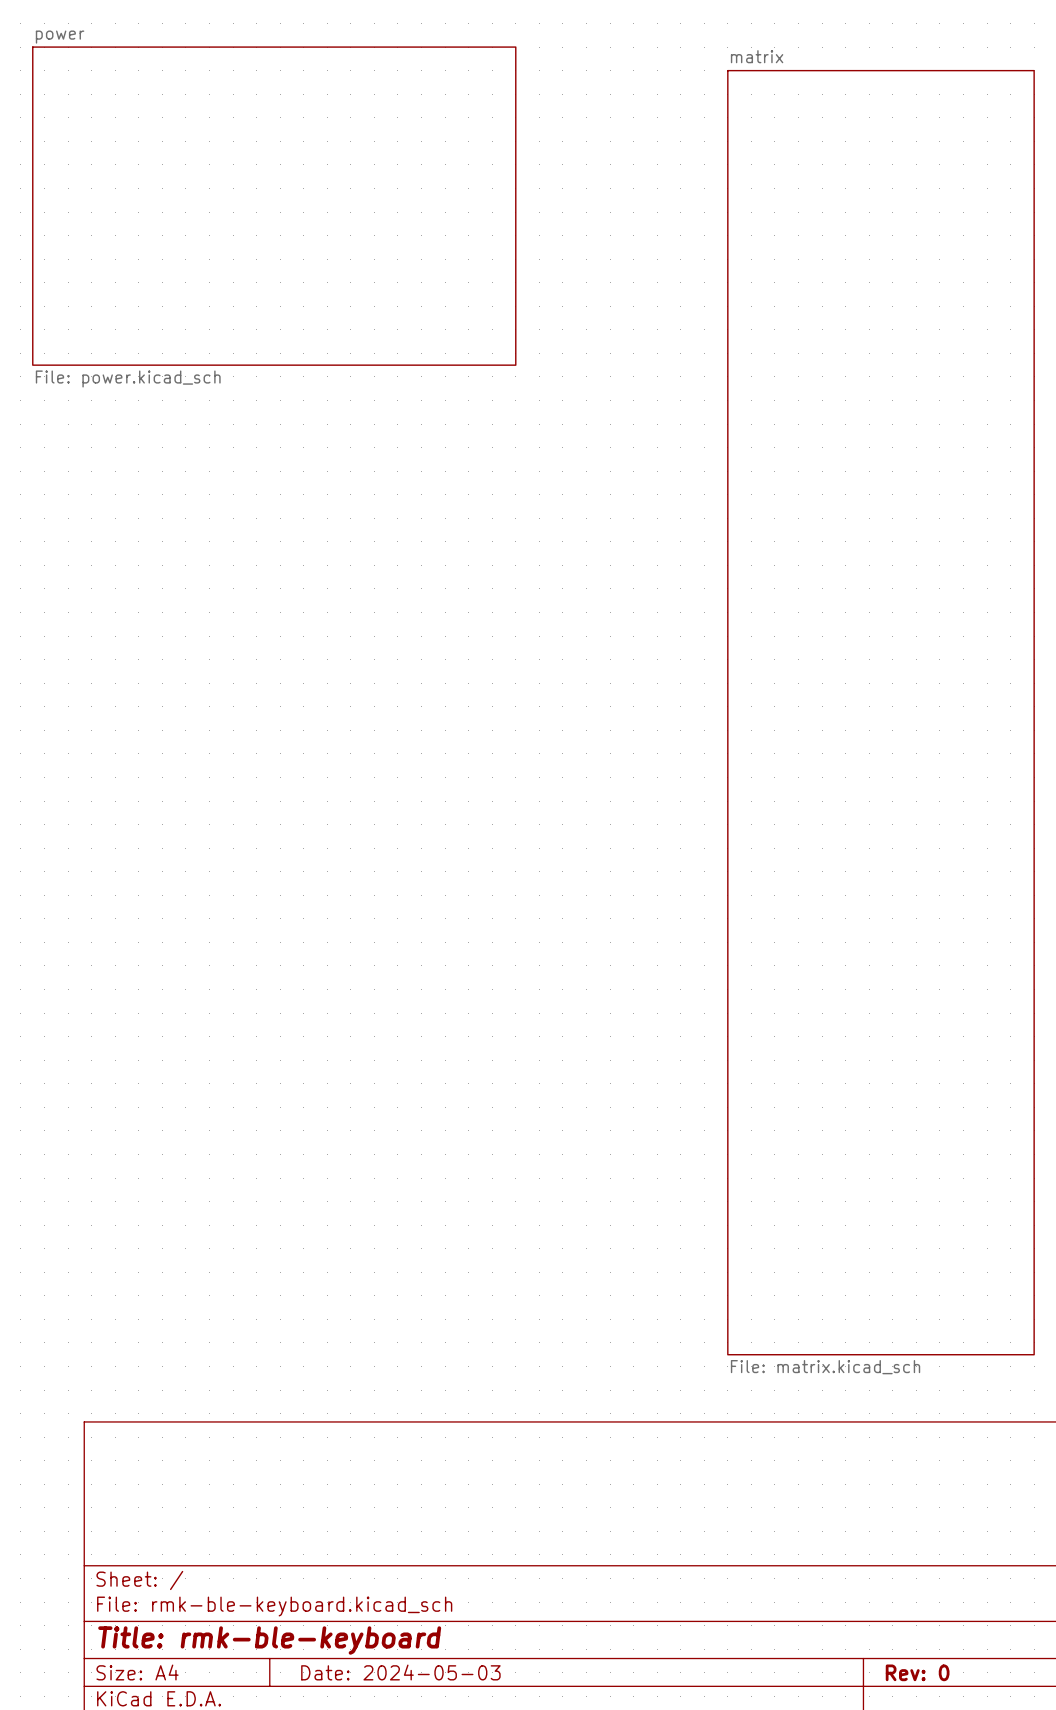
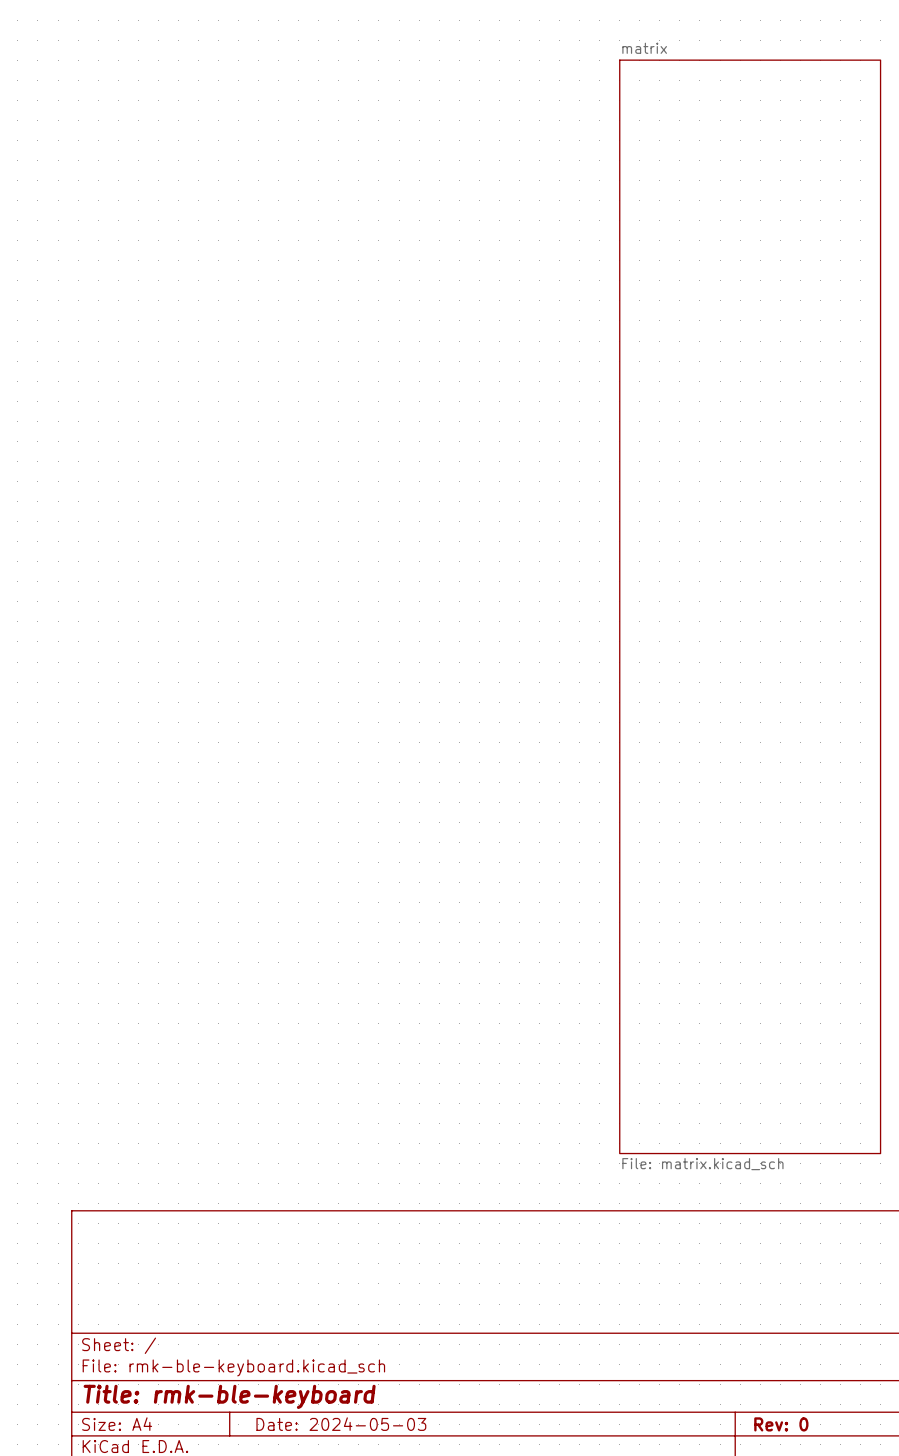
sheet power: File: power.kicad_sch (274, 206) -> none

